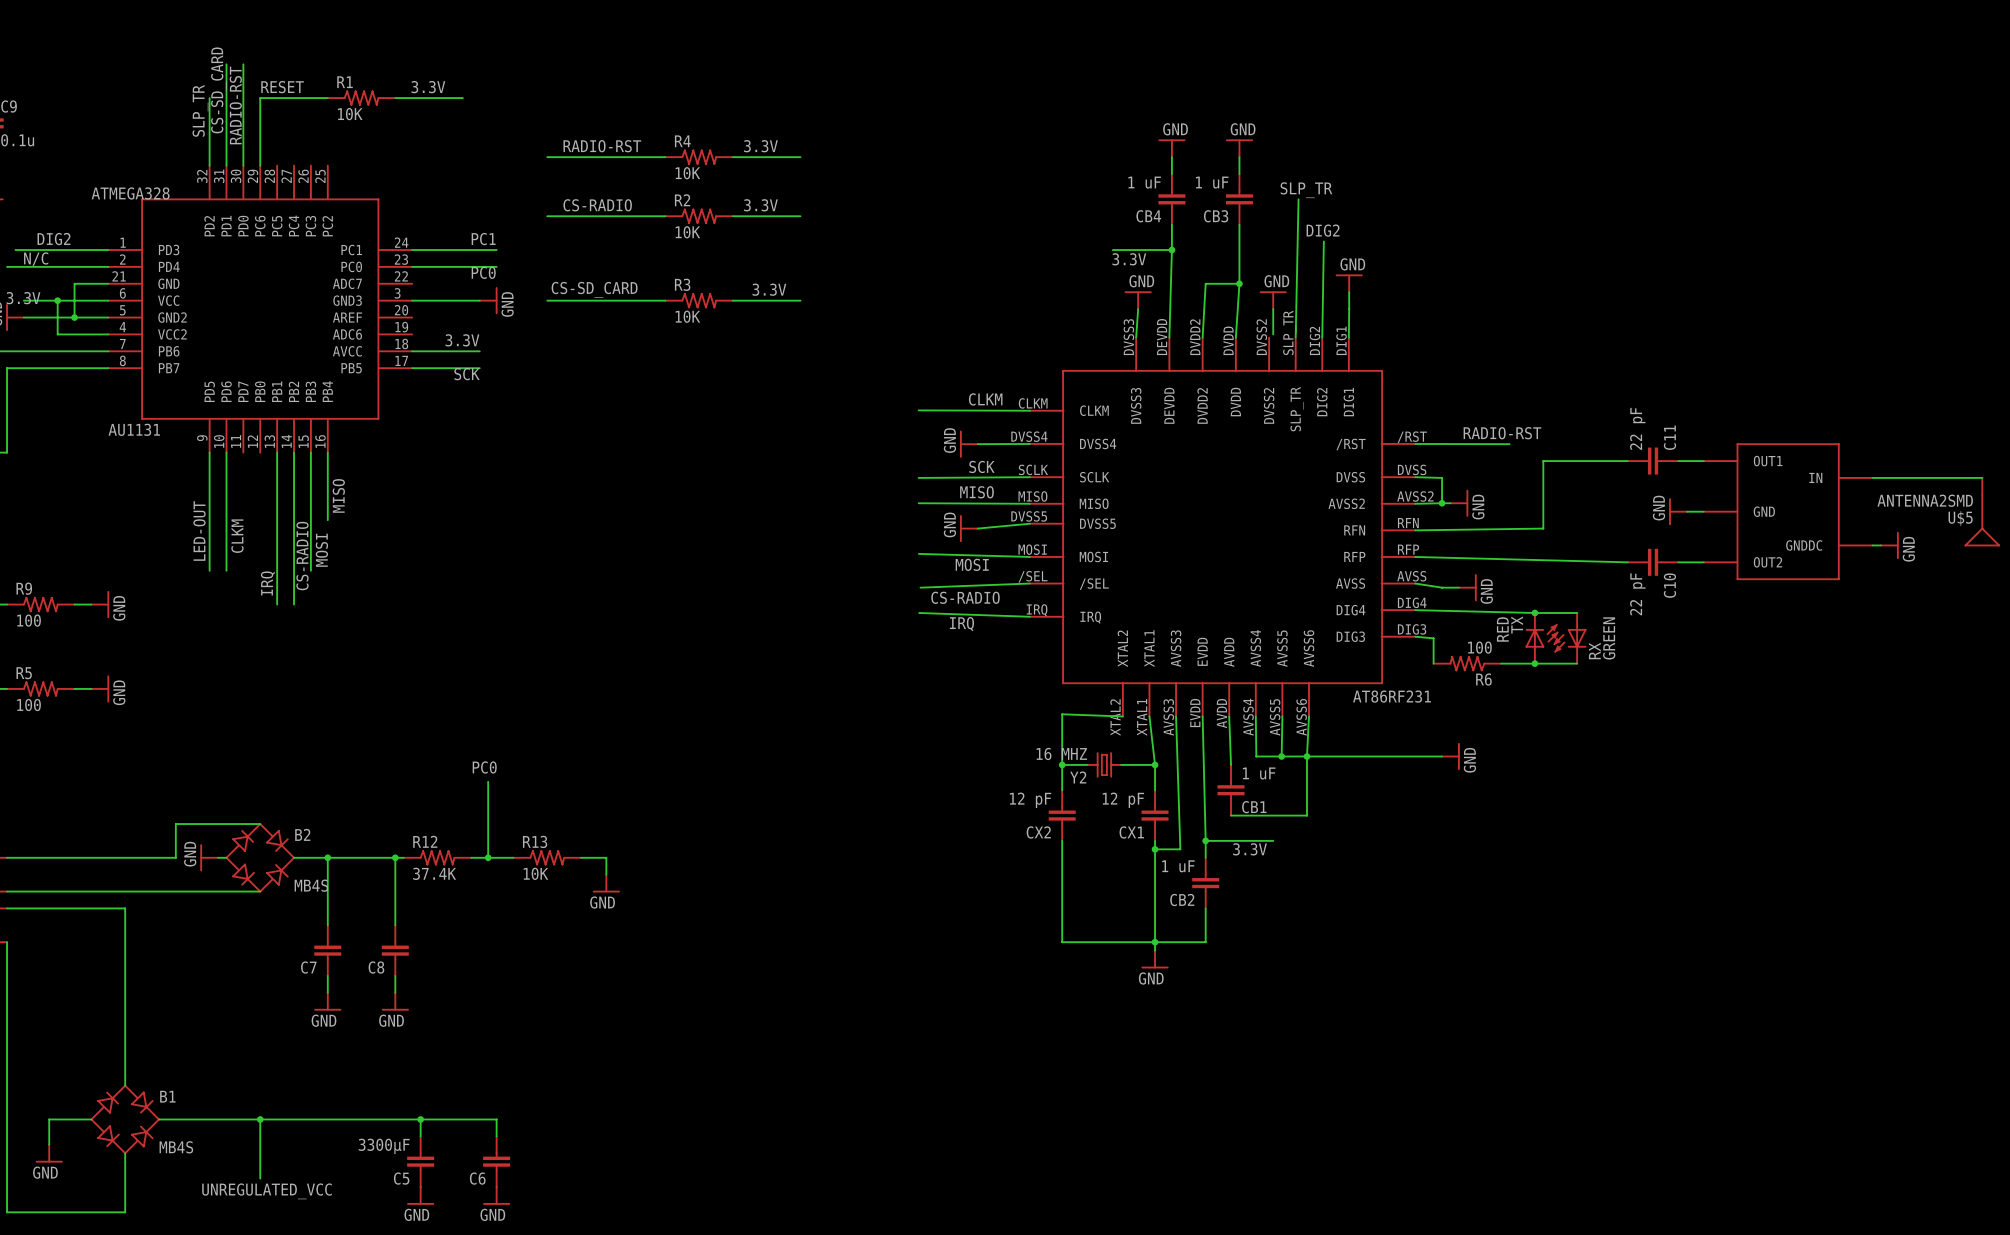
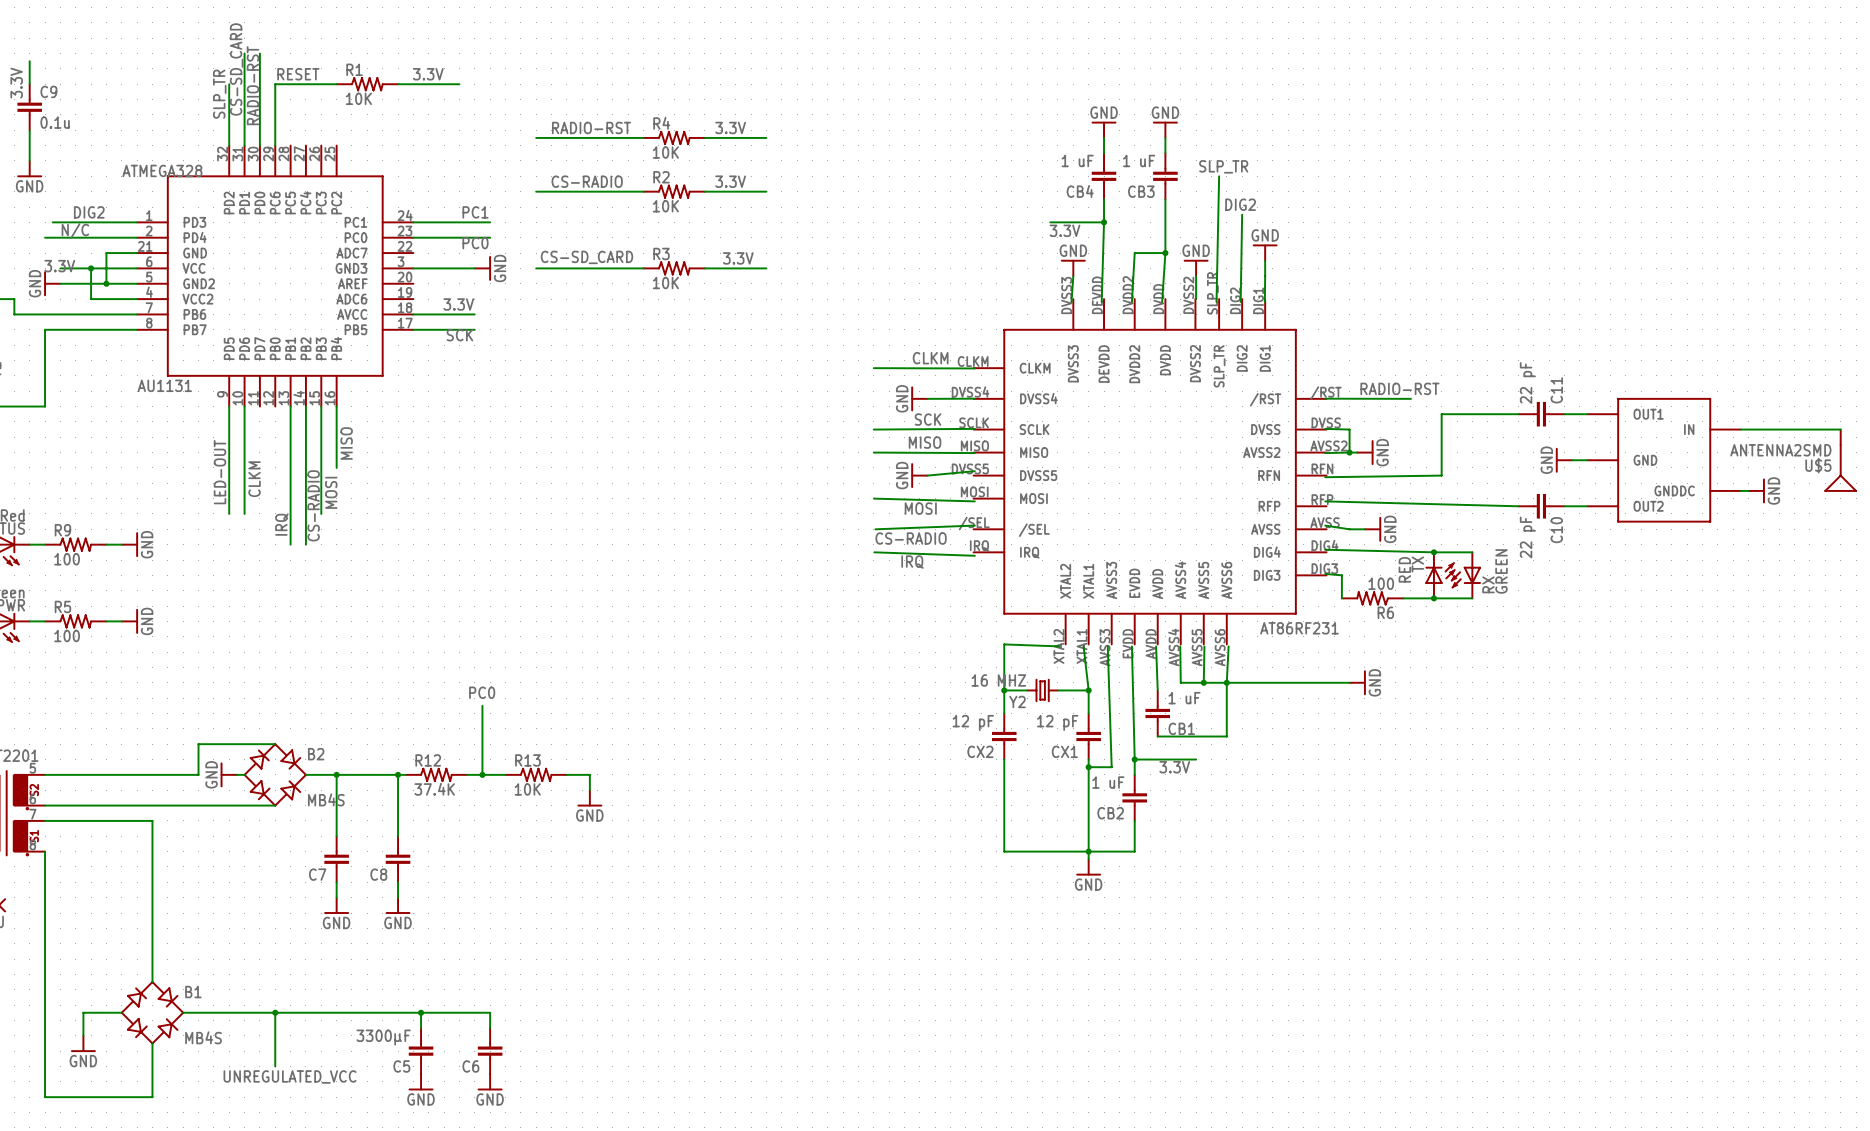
part symbol: [1029, 337, 1416, 717] -> [973, 298, 1327, 645]

